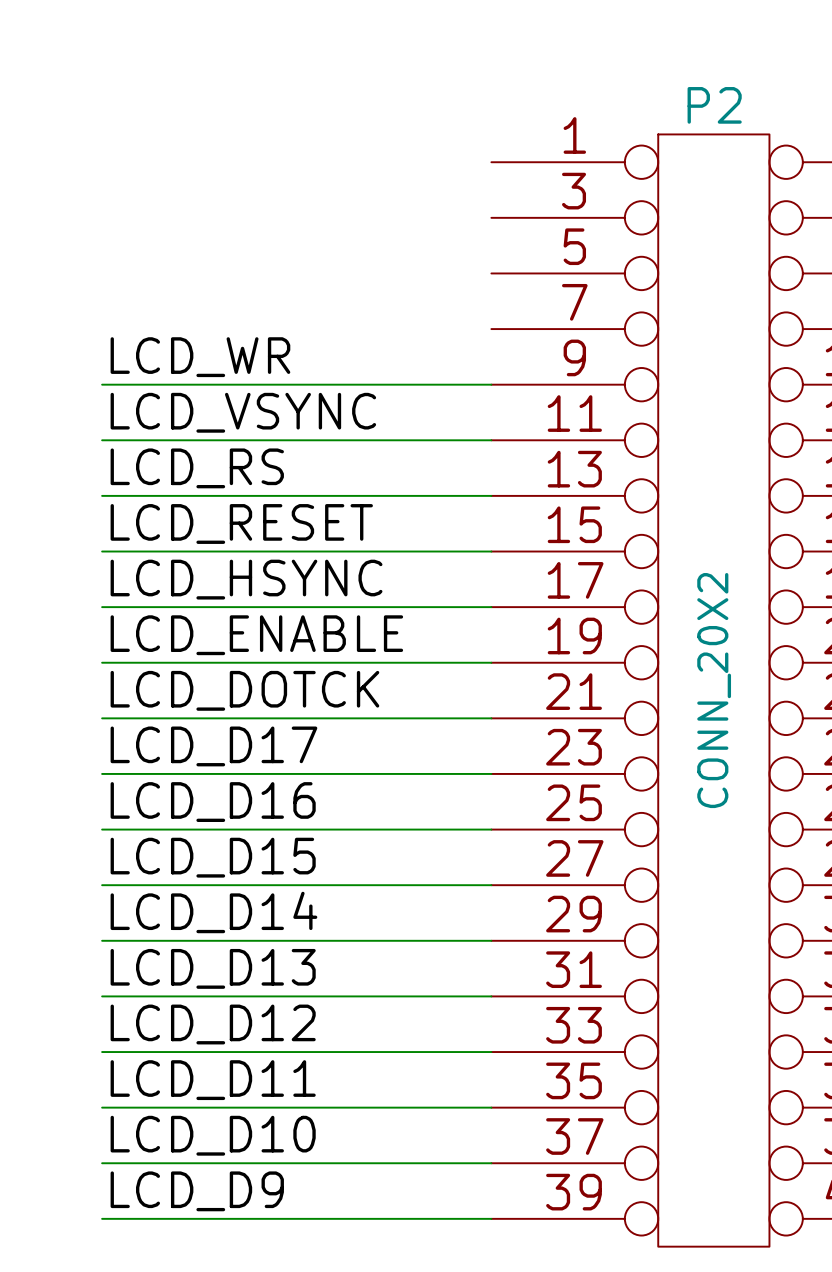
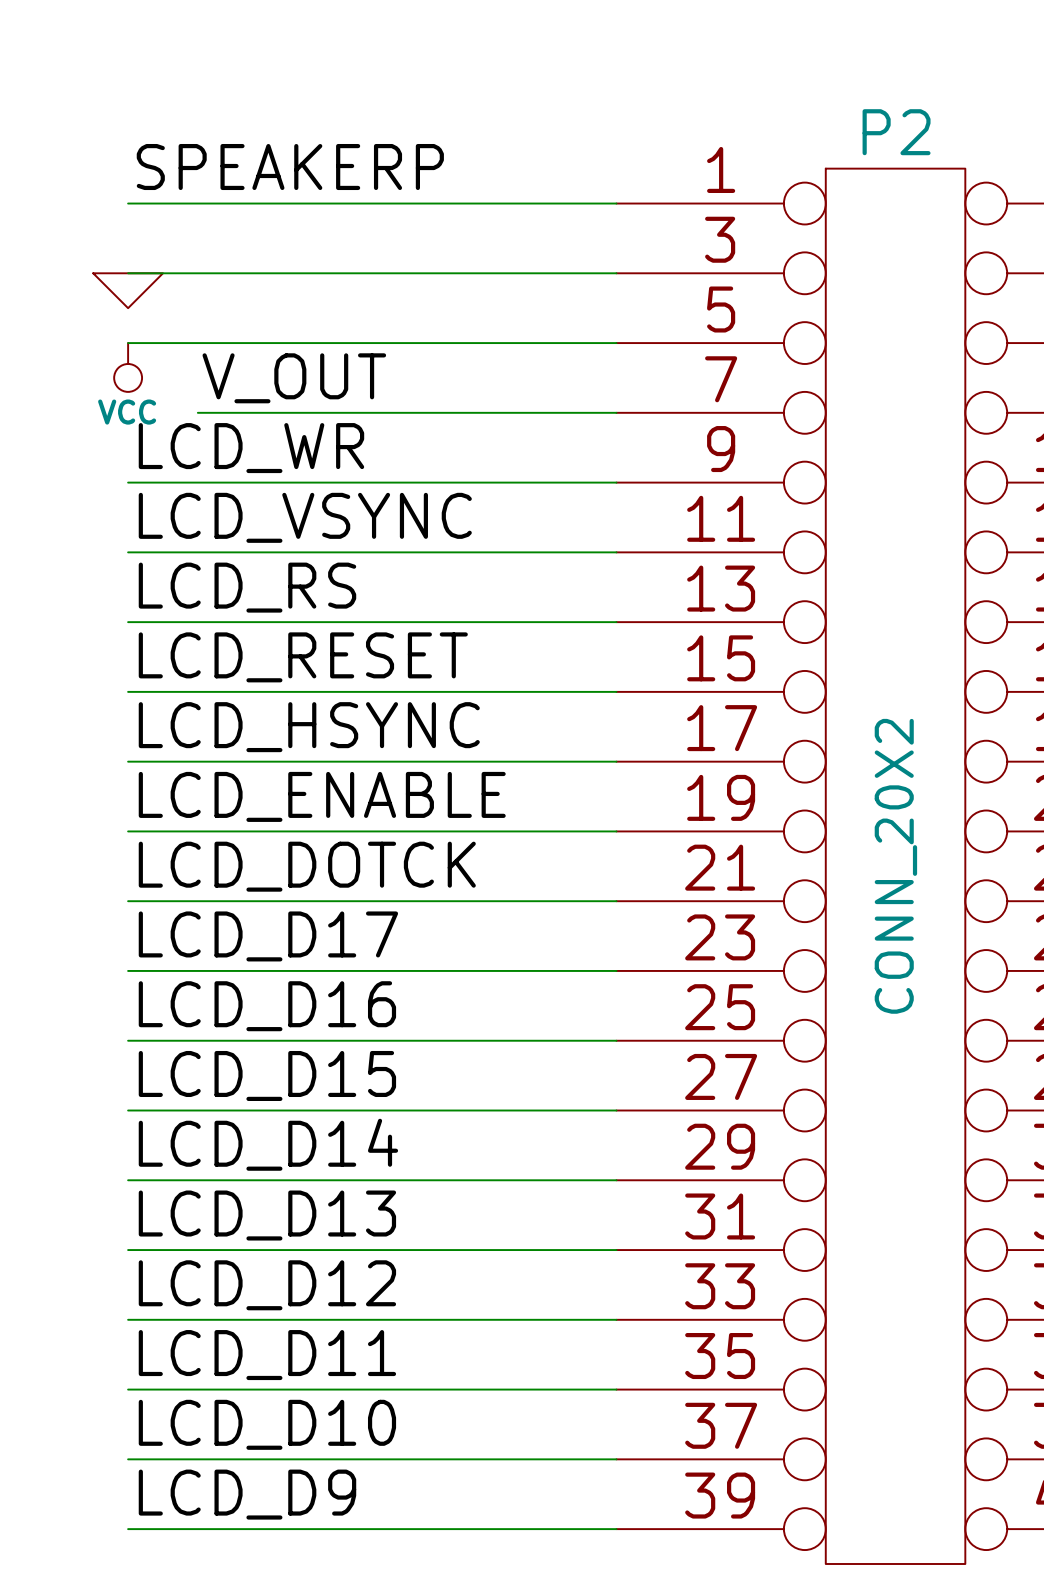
label: none -> SPEAKERP (290, 167)
wire: none -> (128, 203) (616, 203)
wire: none -> (128, 273) (616, 273)
power symbol: none -> (128, 290)
wire: none -> (128, 343) (616, 343)
power symbol: none -> VCC (128, 367)
label: none -> V_OUT (294, 378)
wire: none -> (197, 412) (616, 412)

